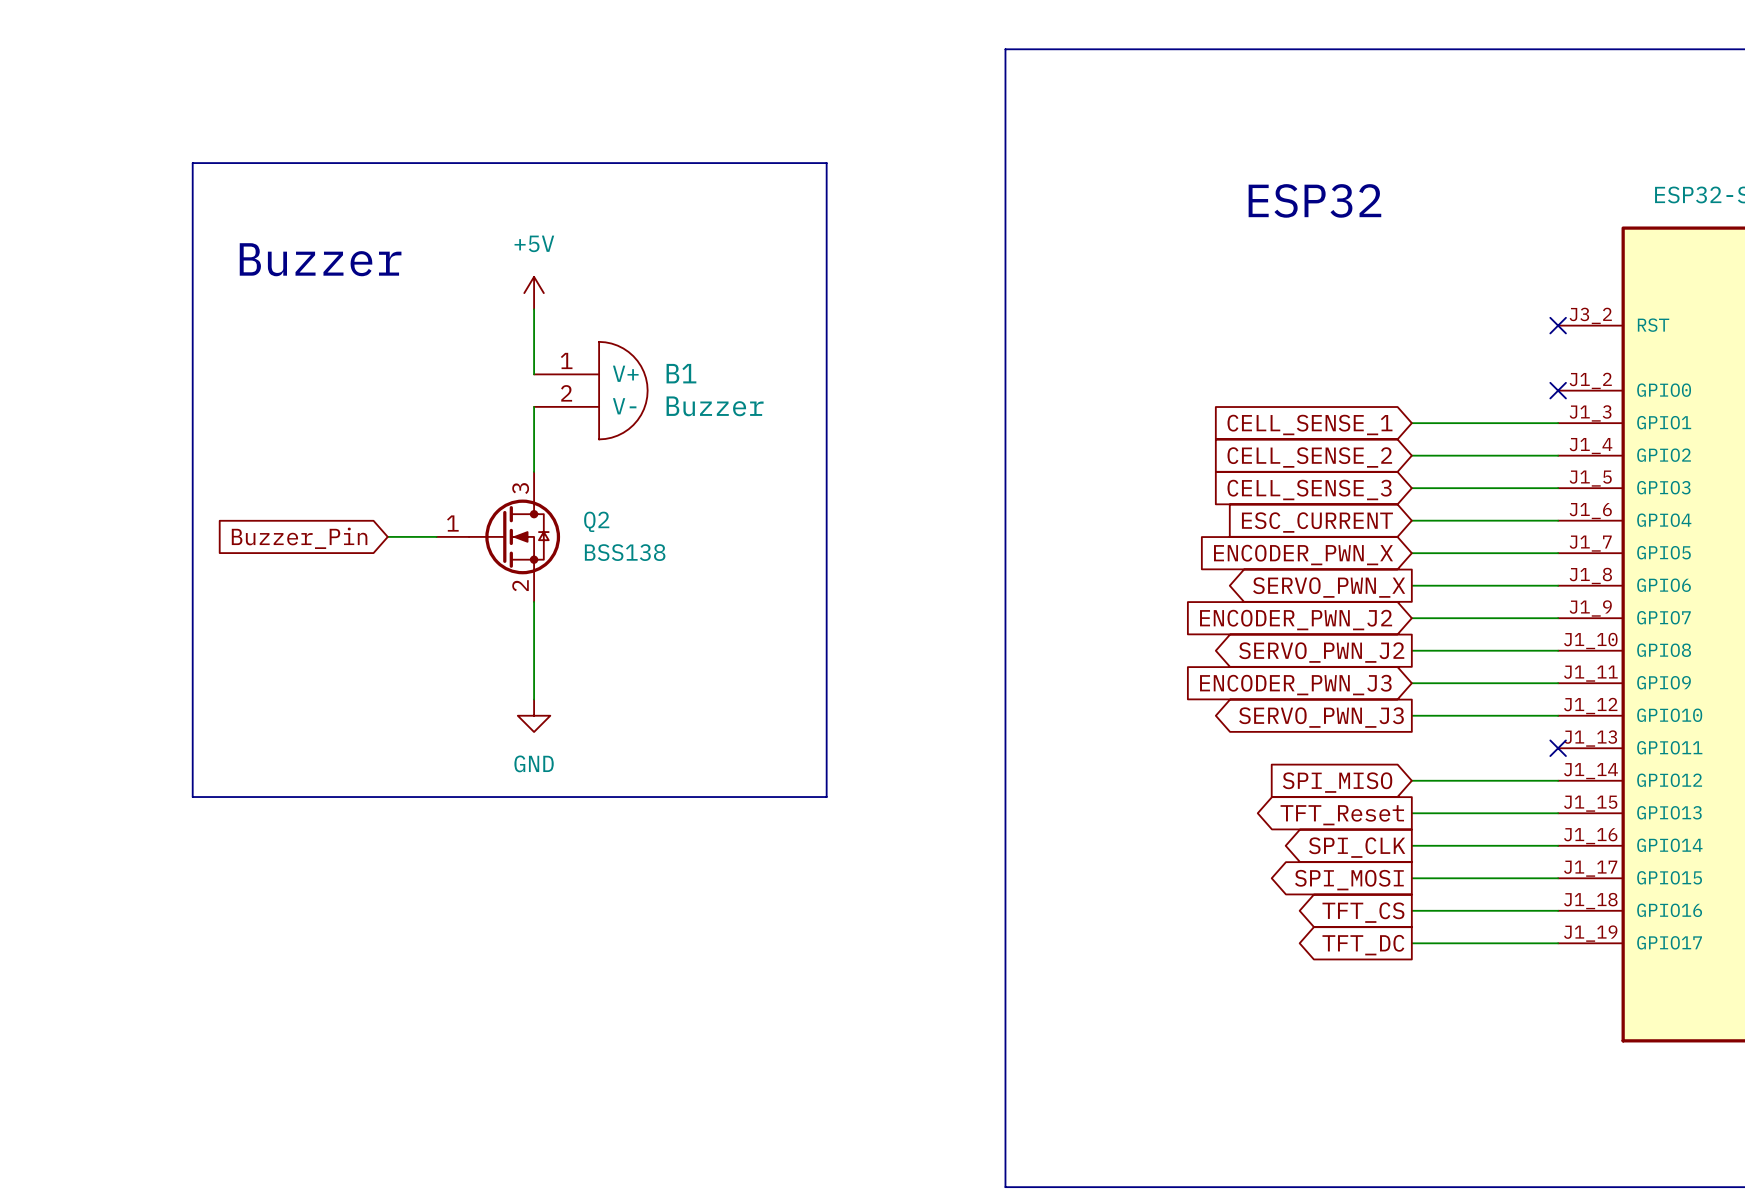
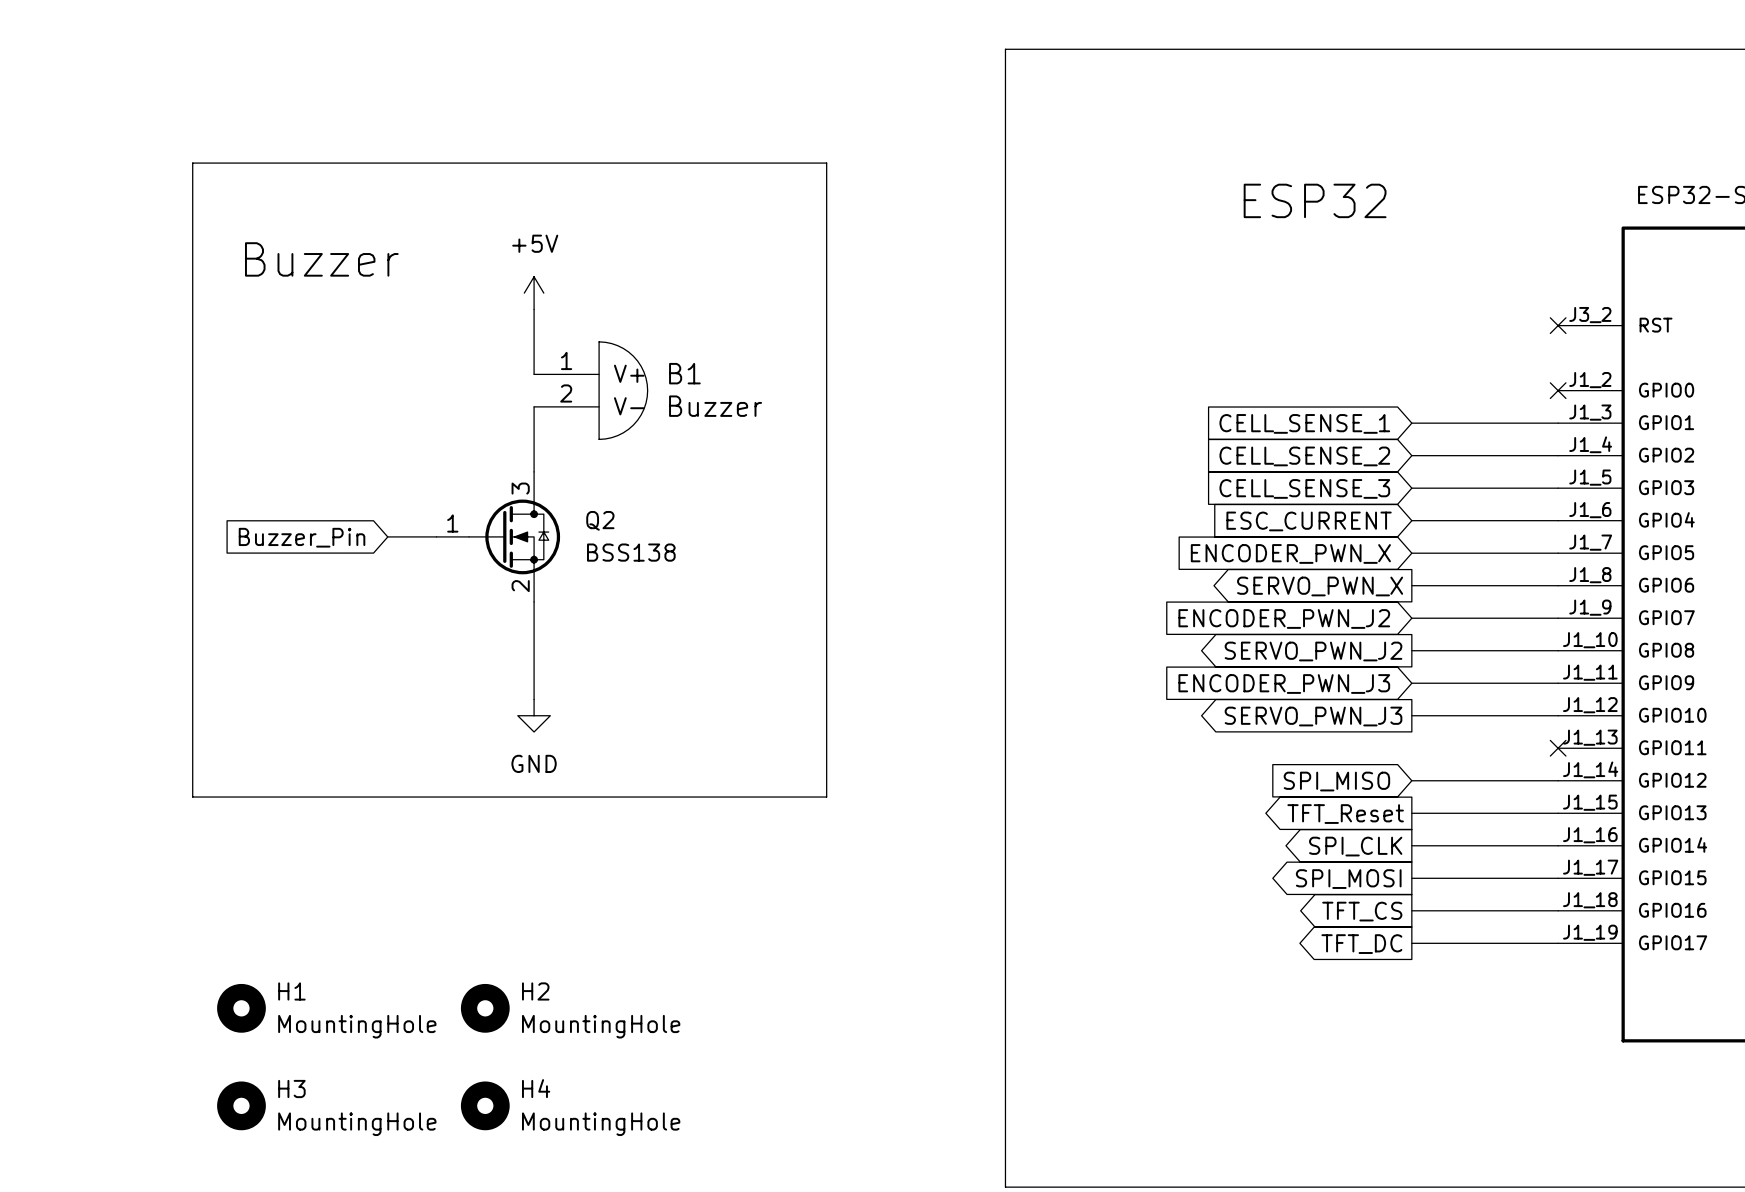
H1: none -> MountingHole (241, 1008)
H2: none -> MountingHole (485, 1008)
H3: none -> MountingHole (241, 1105)
H4: none -> MountingHole (485, 1105)

